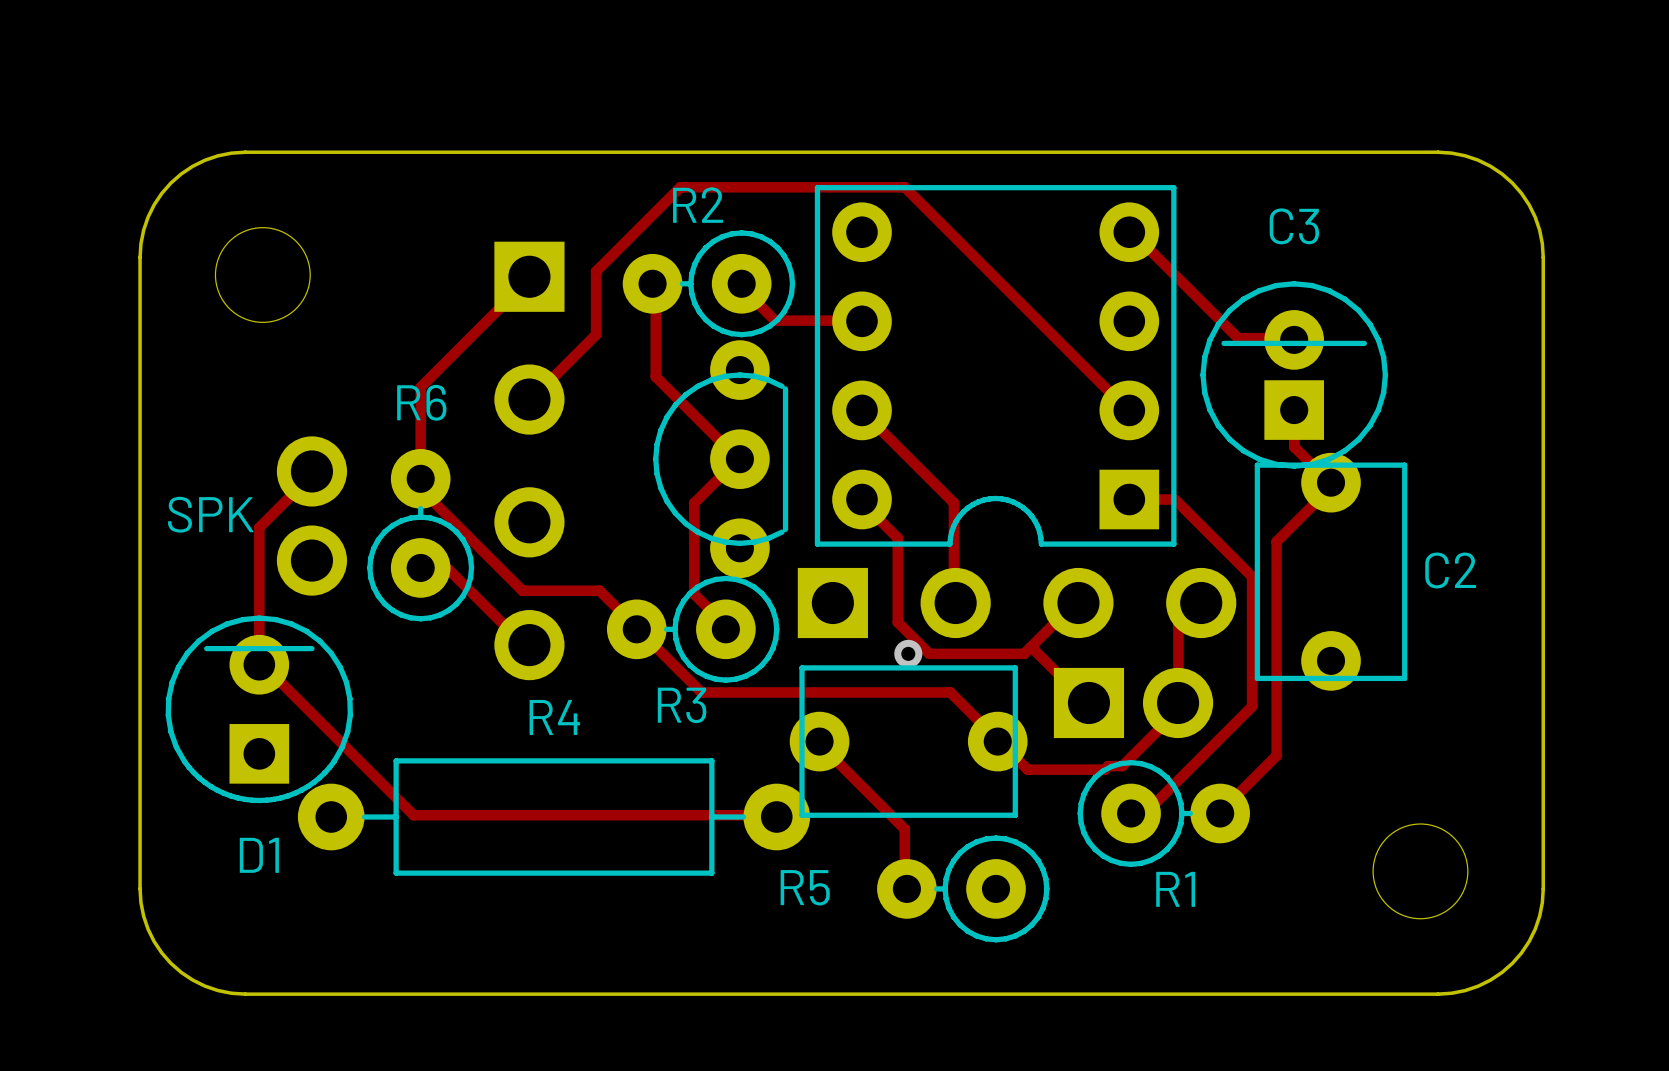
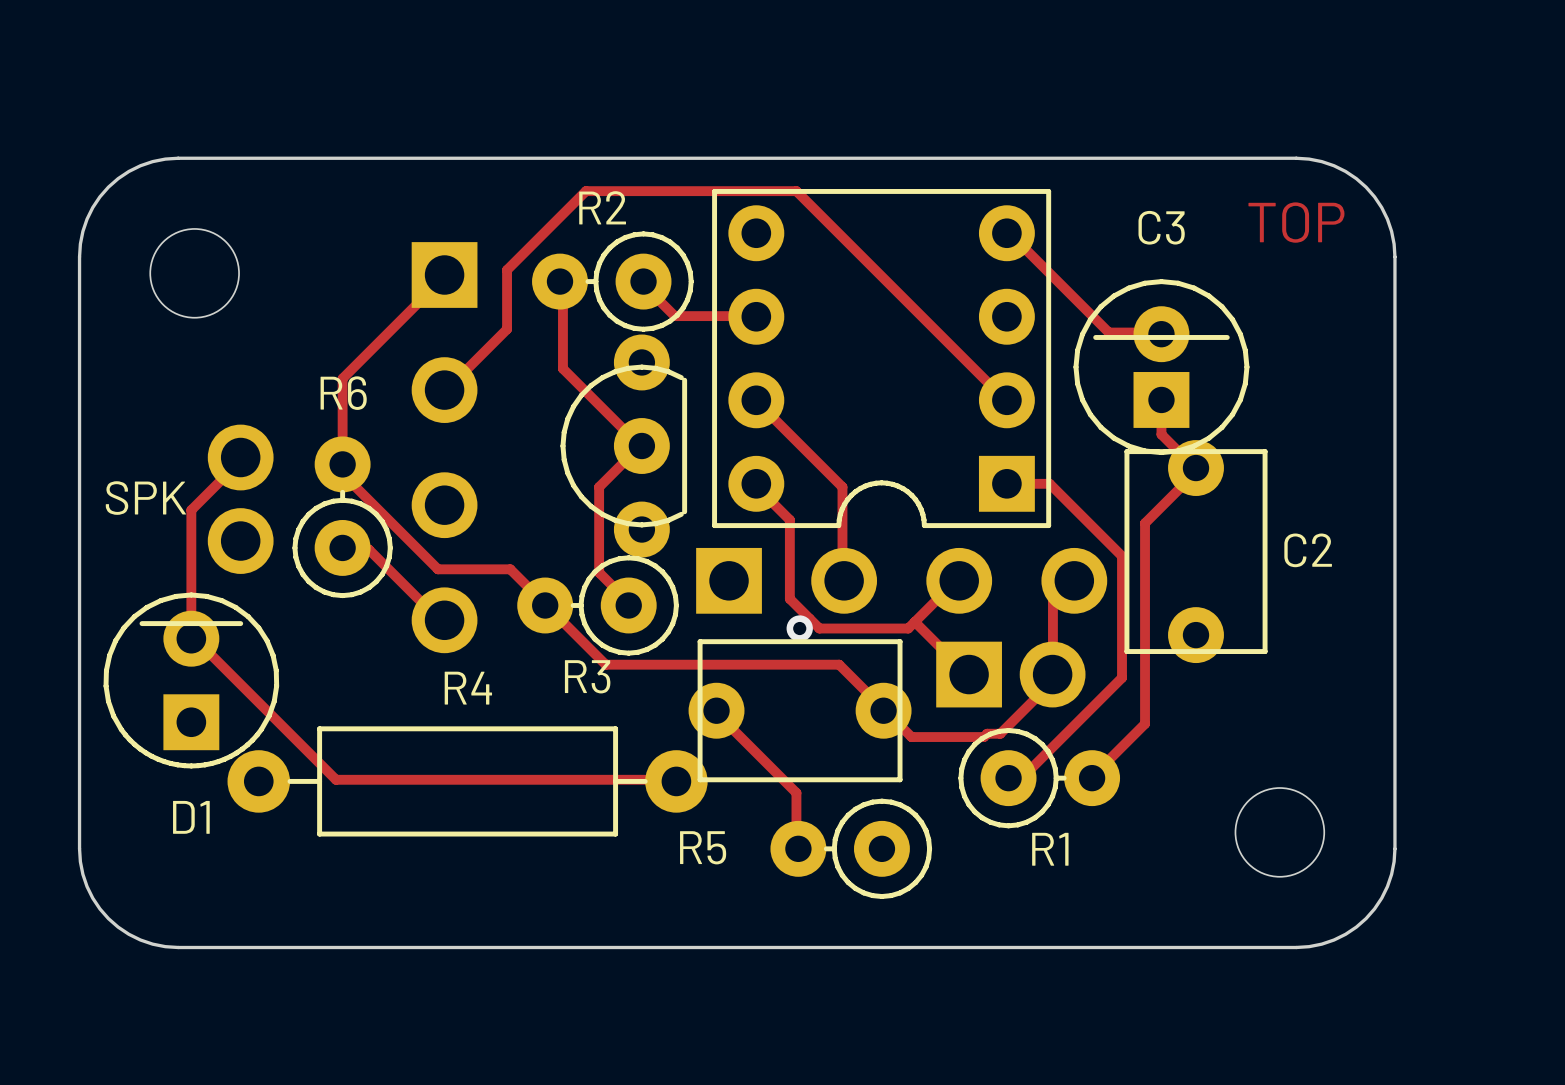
text: none -> TOP (1296, 222)

